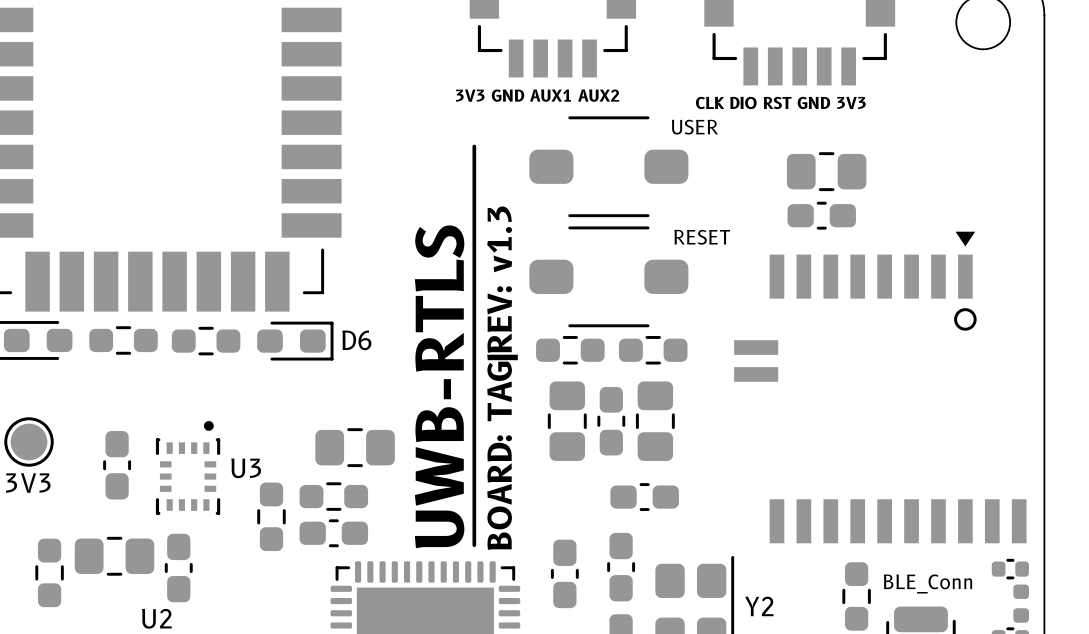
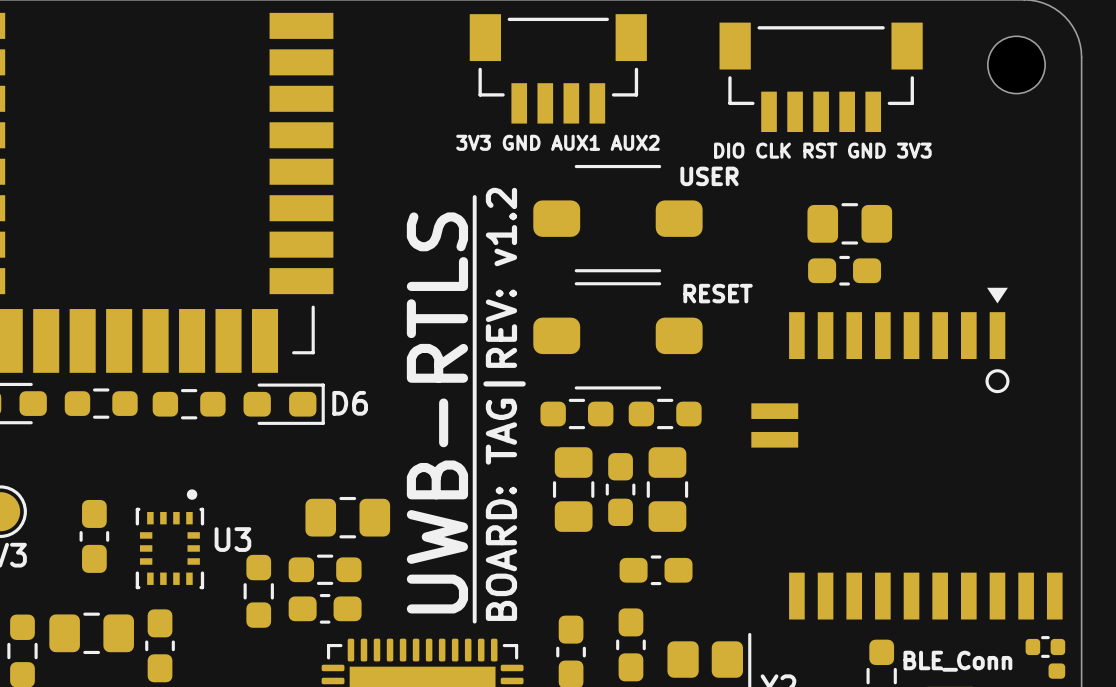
text: CLK DIO RST GND 3V3 (780, 102) -> DIO CLK RST GND 3V3 (822, 150)
text: BOARD: TAG|REV: v1.3 (502, 378) -> BOARD: TAG|REV: v1.2 (504, 404)

